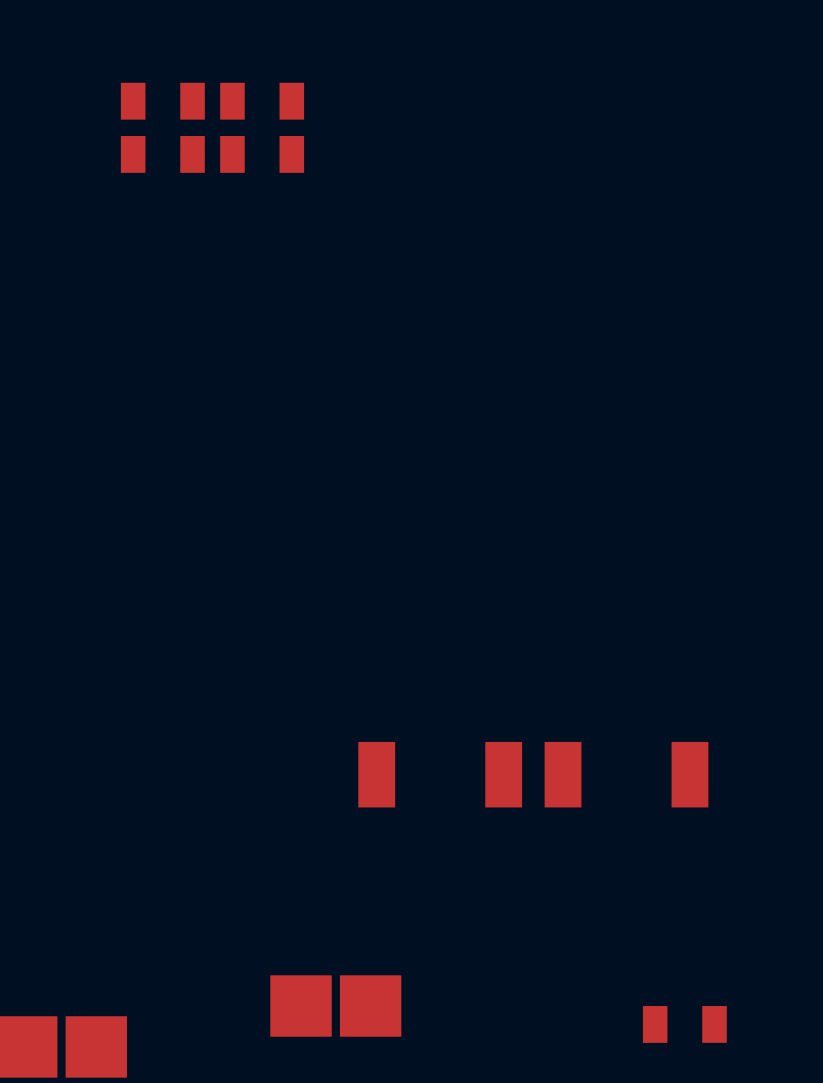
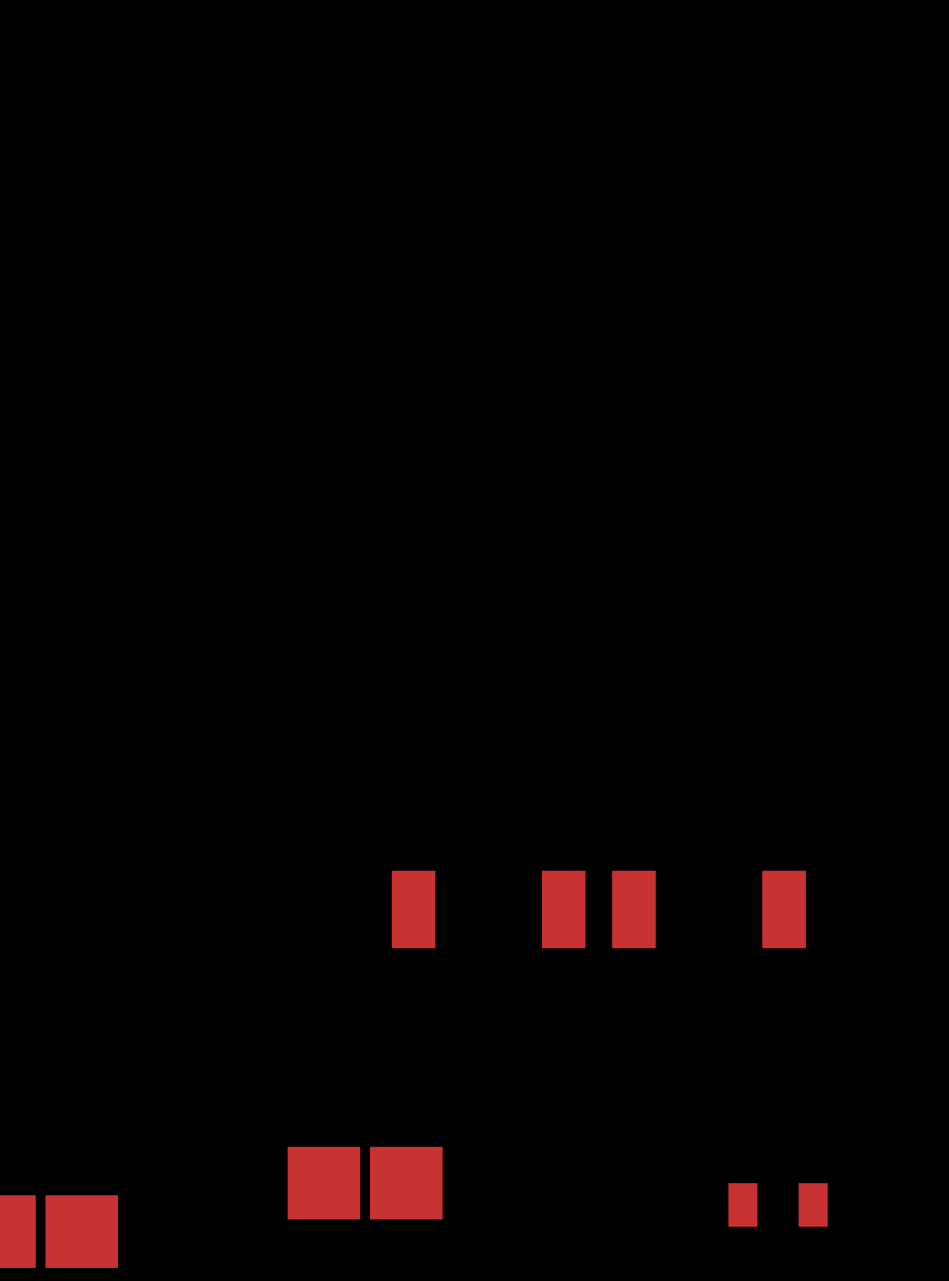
part: (162, 101) -> none
part: (262, 101) -> none
part: (162, 154) -> none
part: (262, 154) -> none

